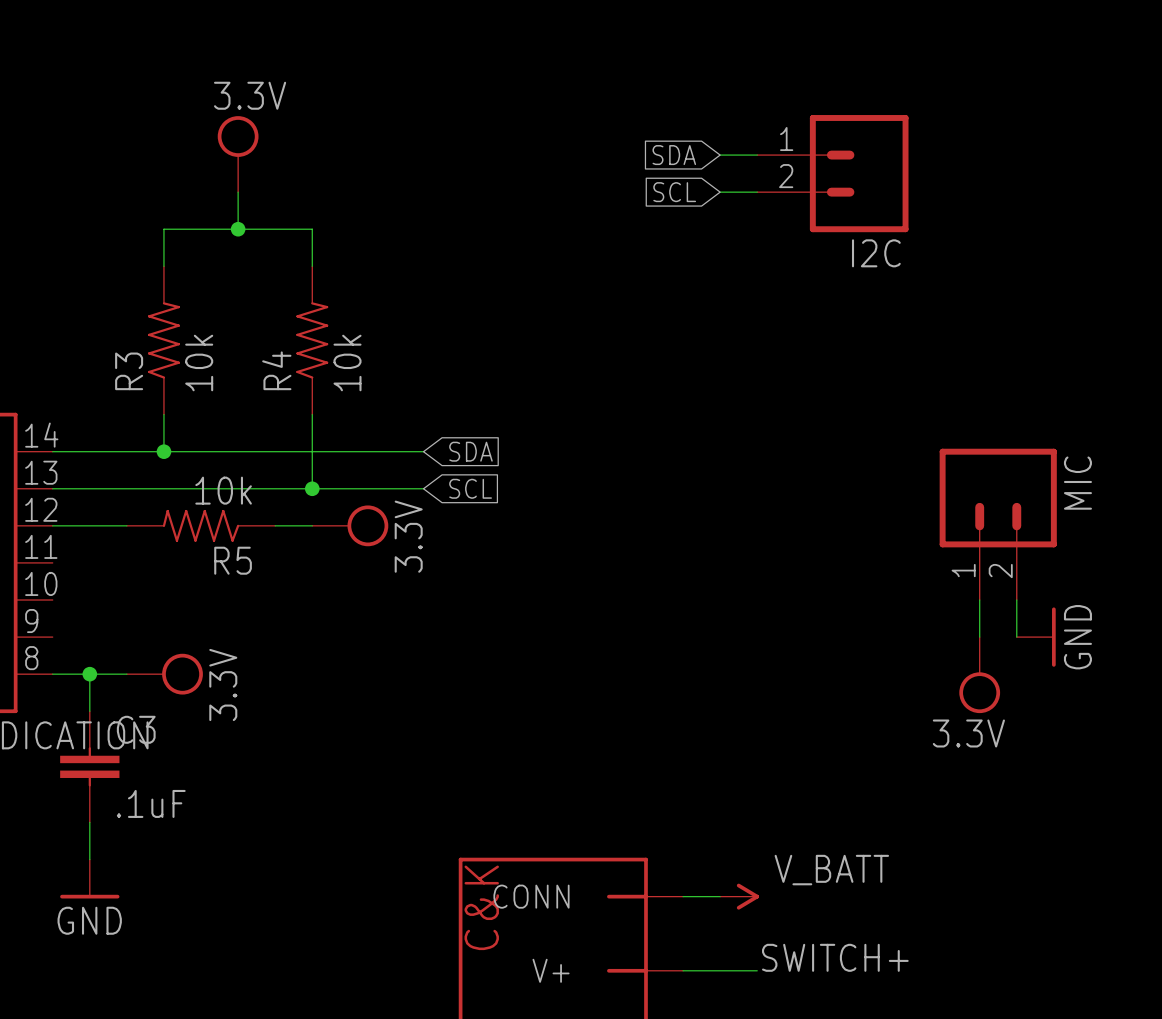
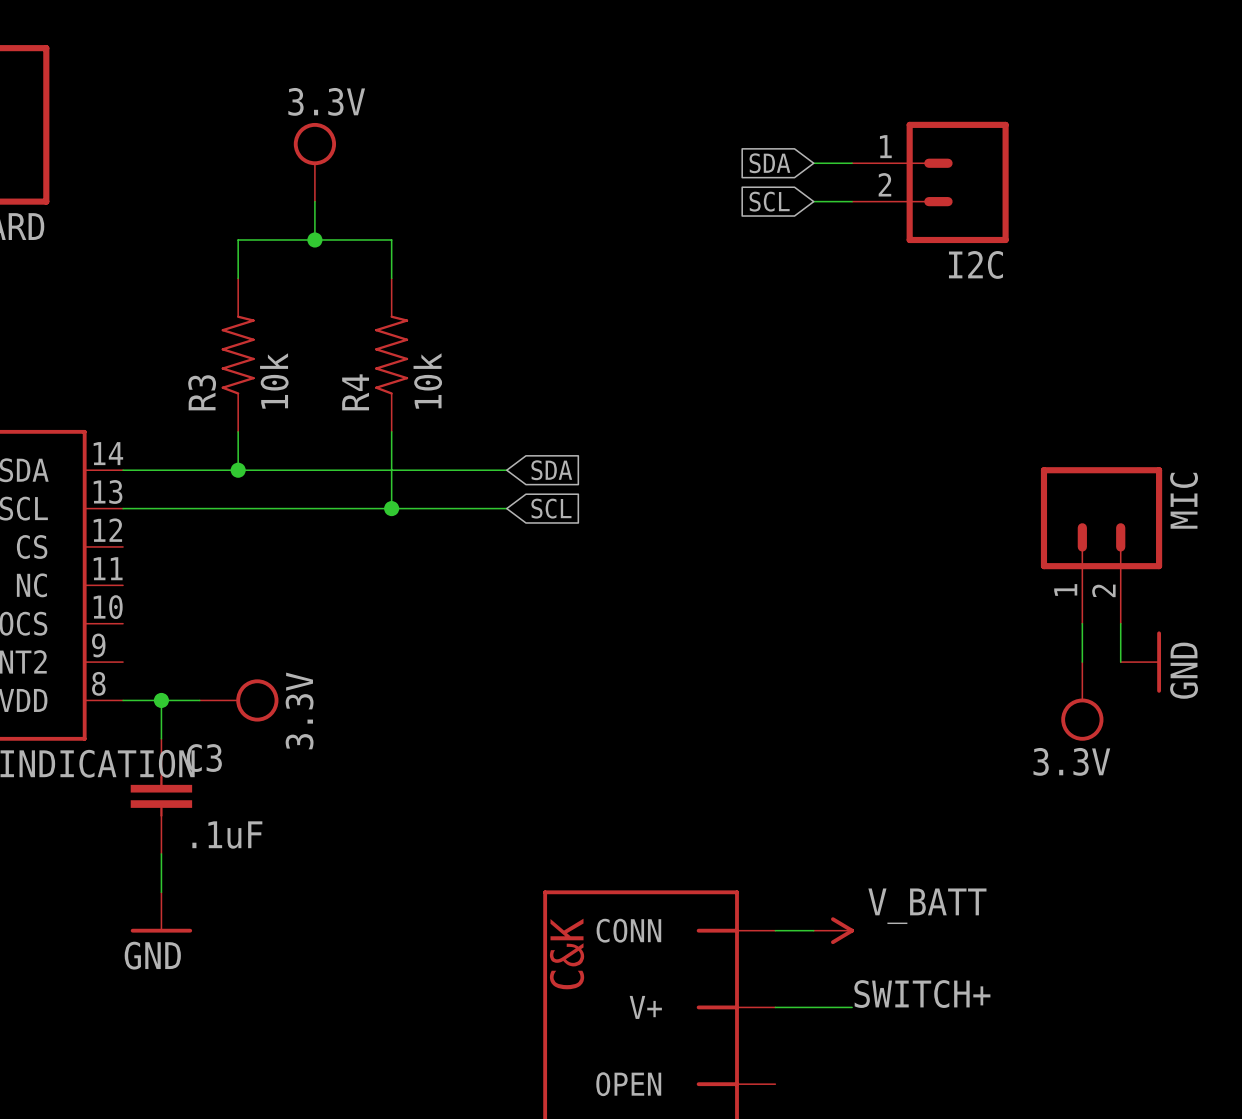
wire: (52, 525) (126, 525) -> none
R5: 10k (201, 525) -> none
wire: (275, 525) (312, 525) -> none
power symbol: 3.3V (350, 525) -> none

